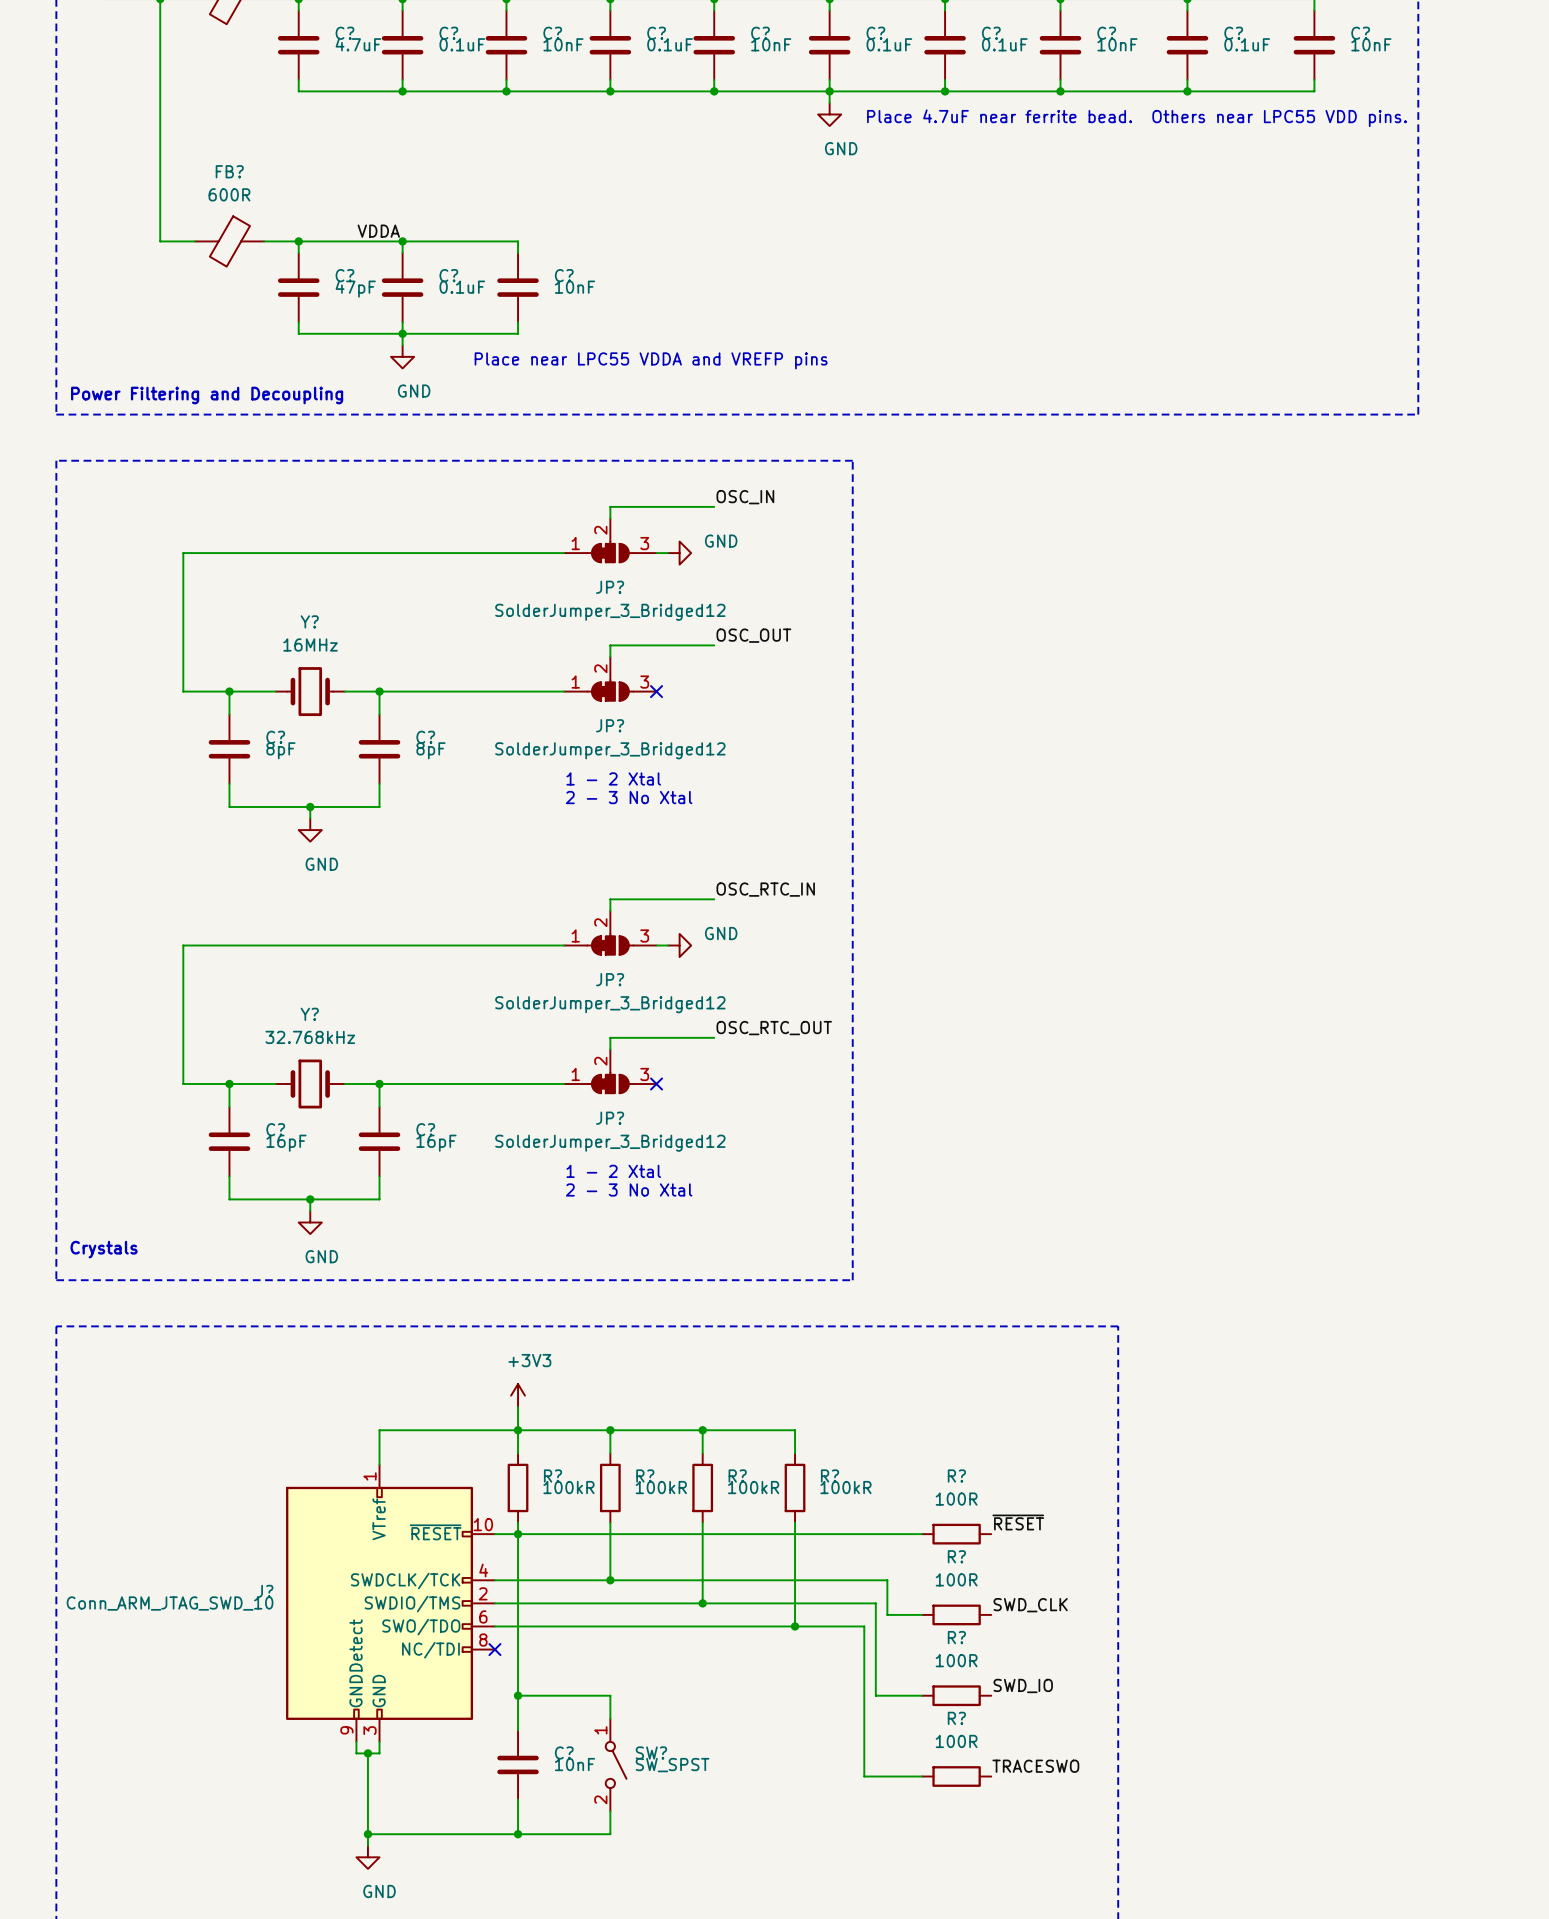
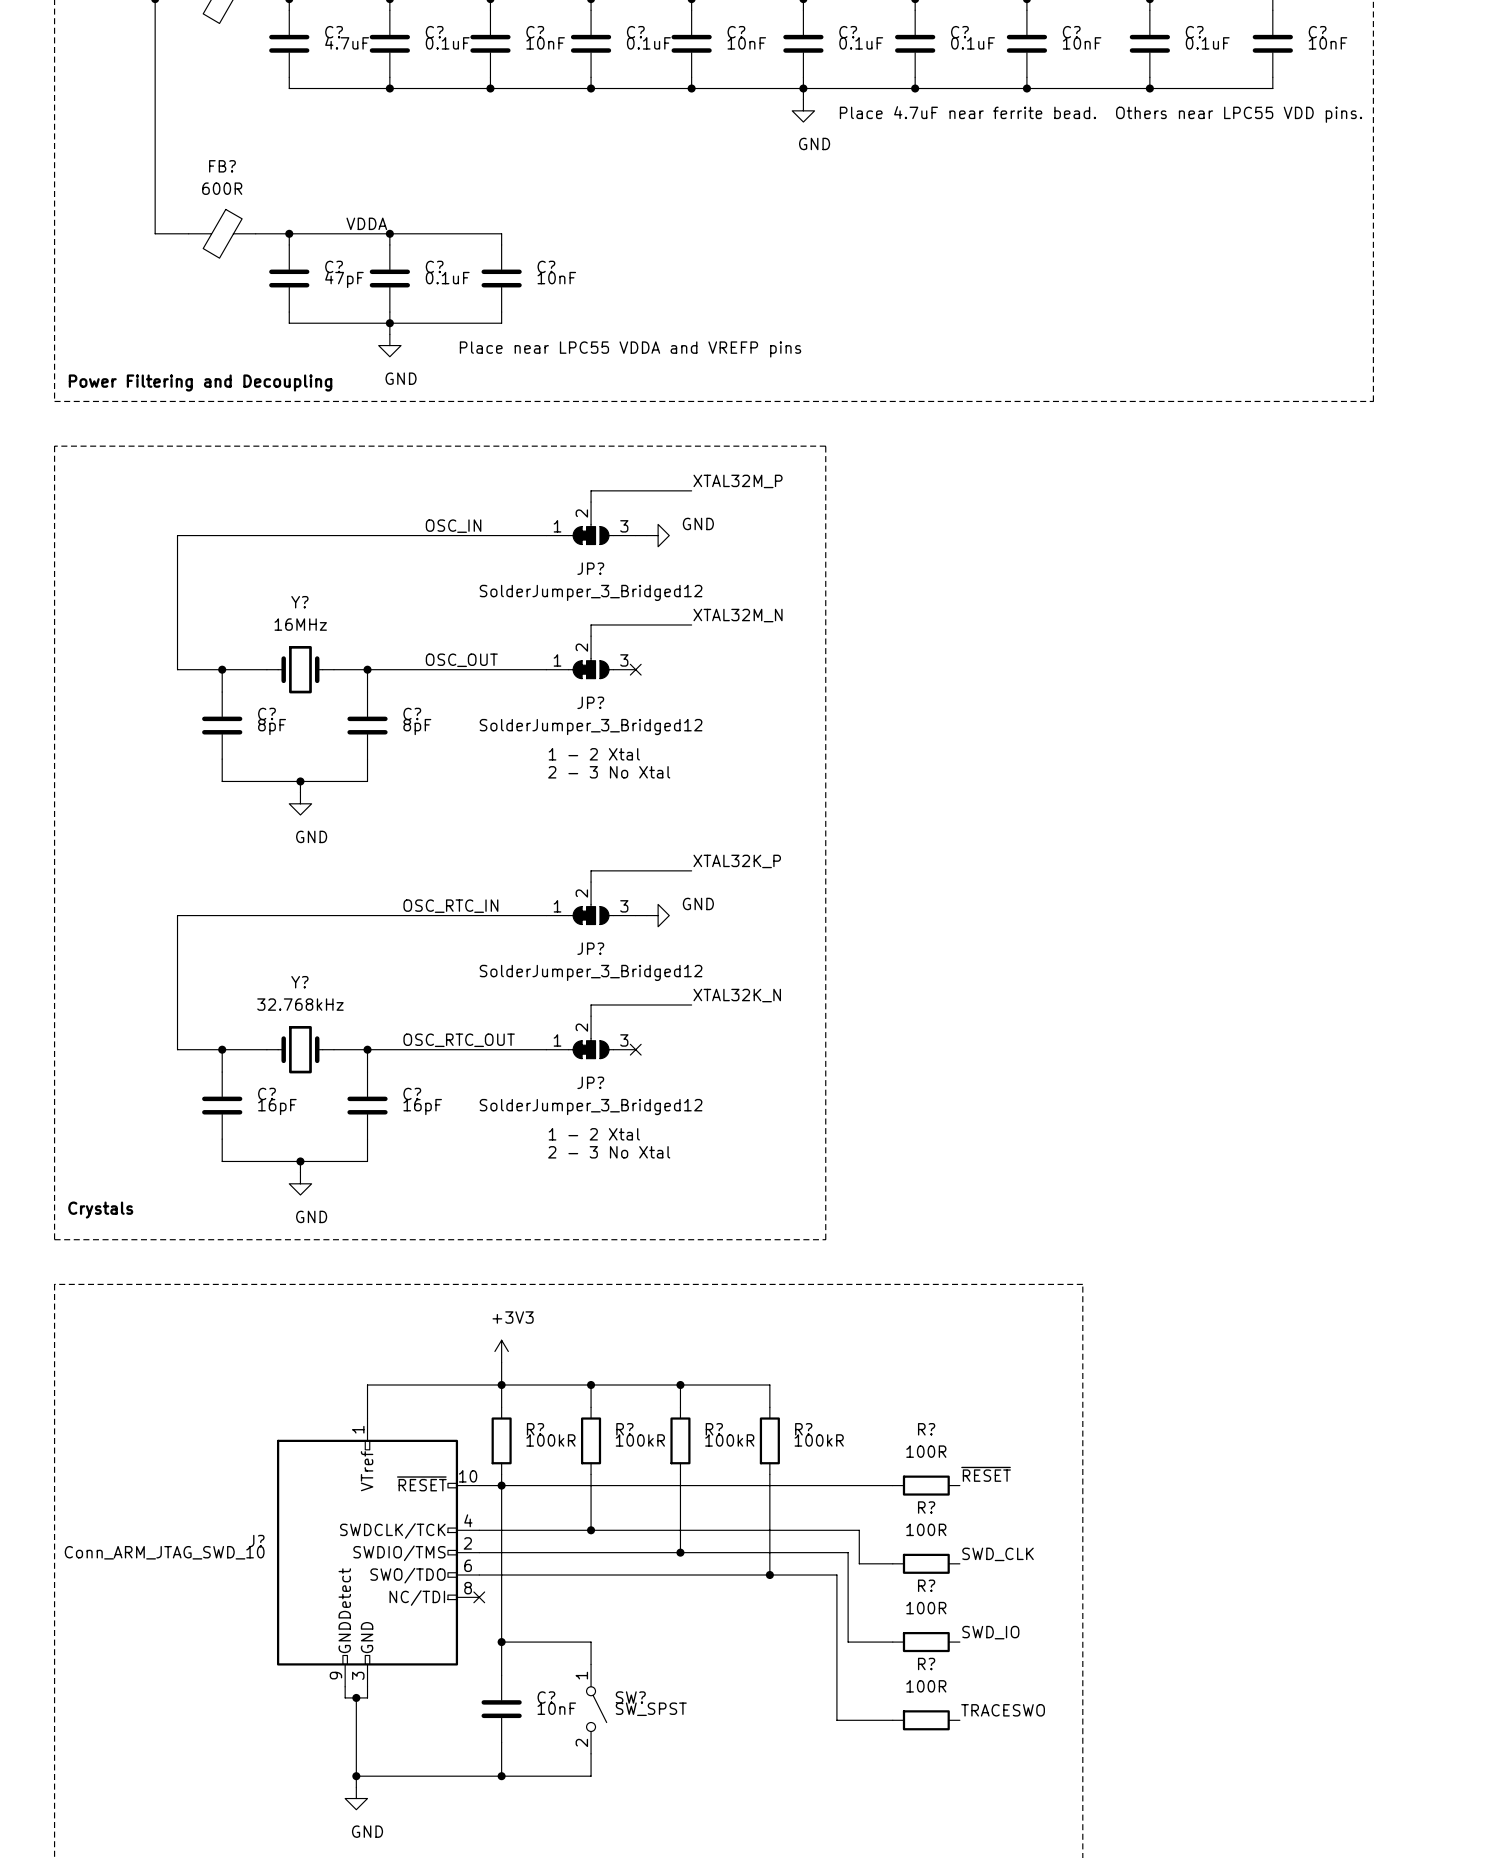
label: OSC_IN (745, 497) -> XTAL32M_P (738, 481)
label: none -> OSC_IN (453, 526)
label: OSC_OUT (753, 635) -> XTAL32M_N (738, 615)
label: none -> OSC_OUT (461, 660)
label: OSC_RTC_IN (765, 889) -> XTAL32K_P (737, 861)
label: none -> OSC_RTC_IN (450, 906)
label: OSC_RTC_OUT (774, 1028) -> XTAL32K_N (737, 995)
label: none -> OSC_RTC_OUT (459, 1040)

